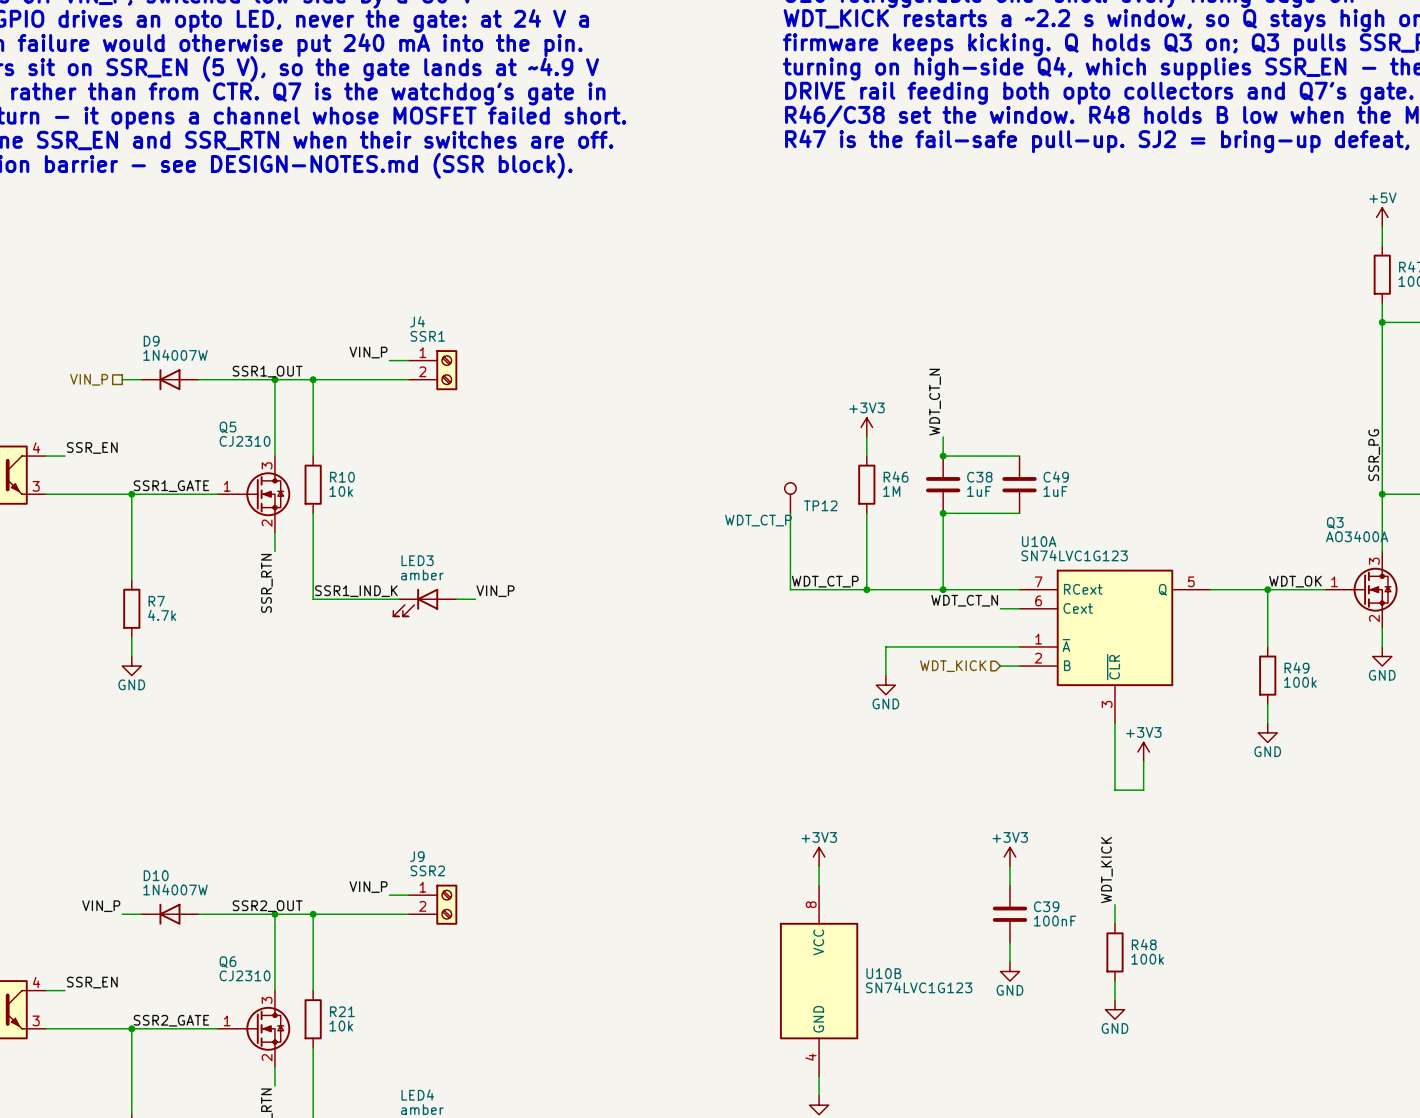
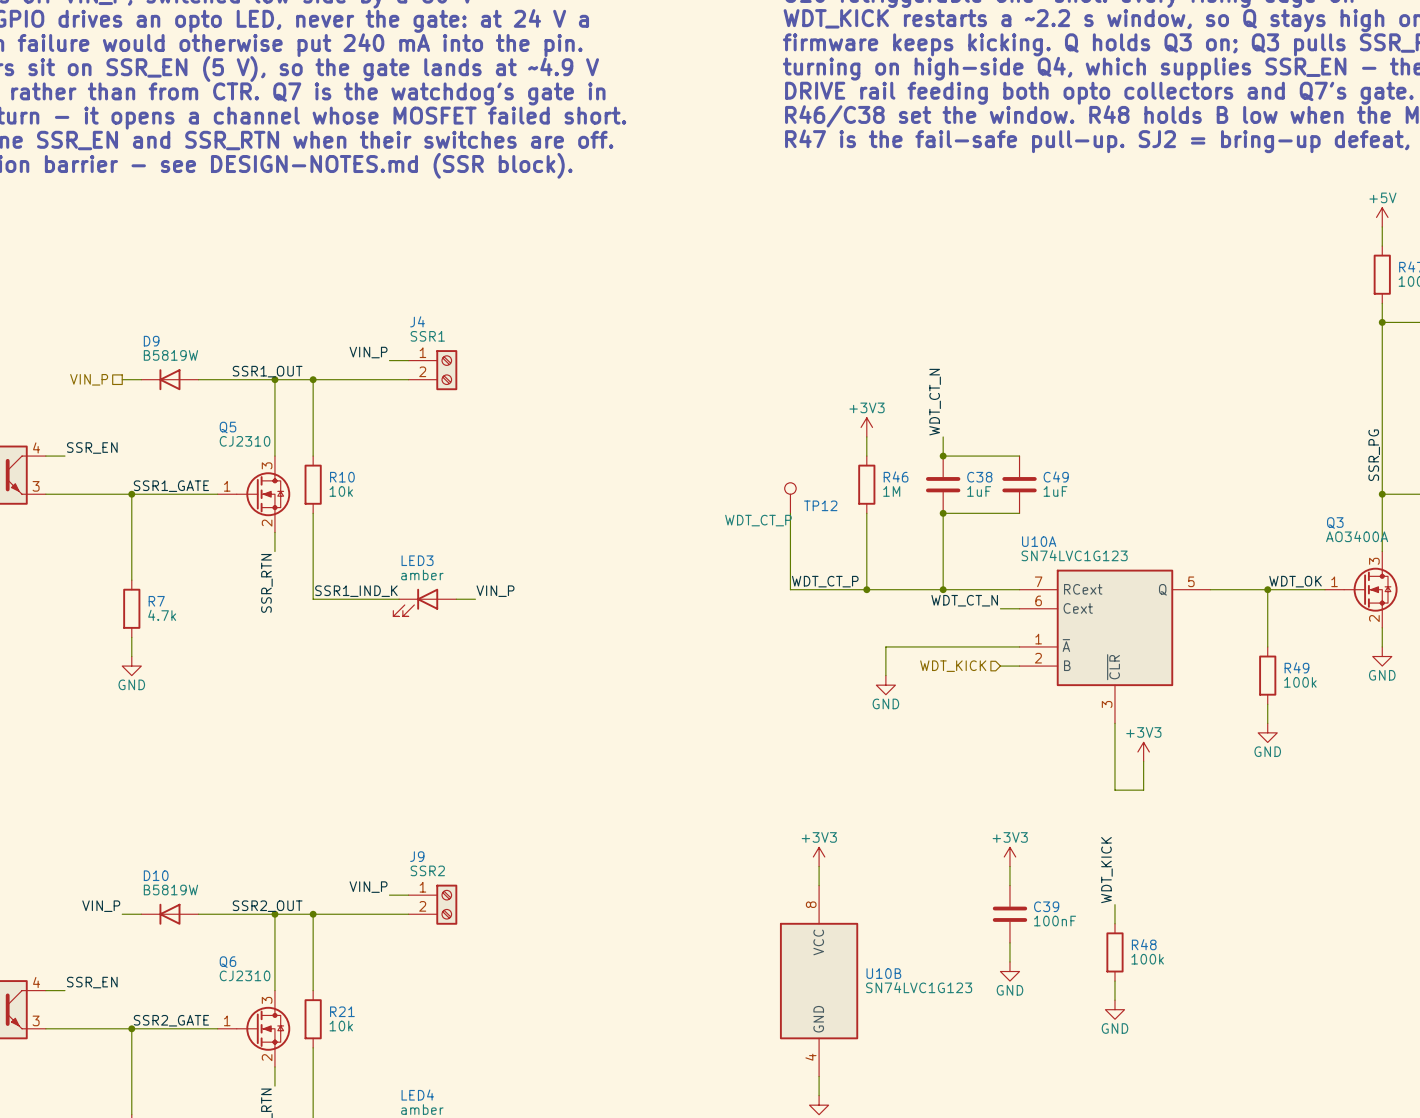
D9 value: 1N4007W (175, 355) -> B5819W (170, 355)
D10 value: 1N4007W (175, 889) -> B5819W (170, 889)

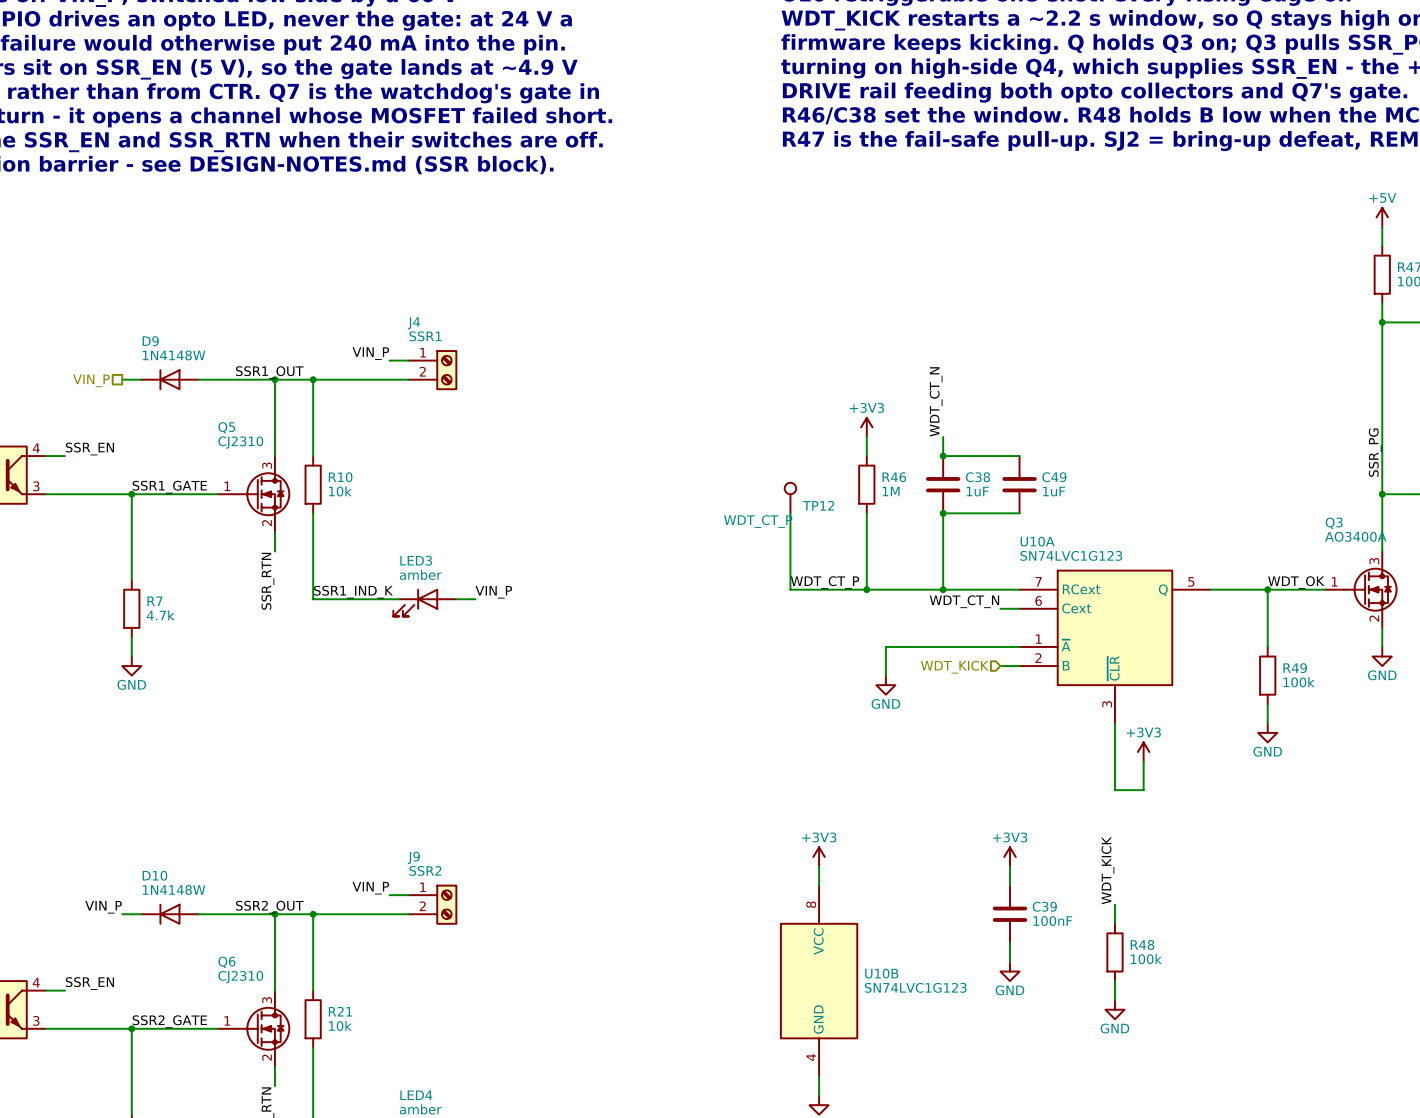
D9 value: B5819W (170, 355) -> 1N4148W (174, 355)
D10 value: B5819W (170, 889) -> 1N4148W (174, 890)

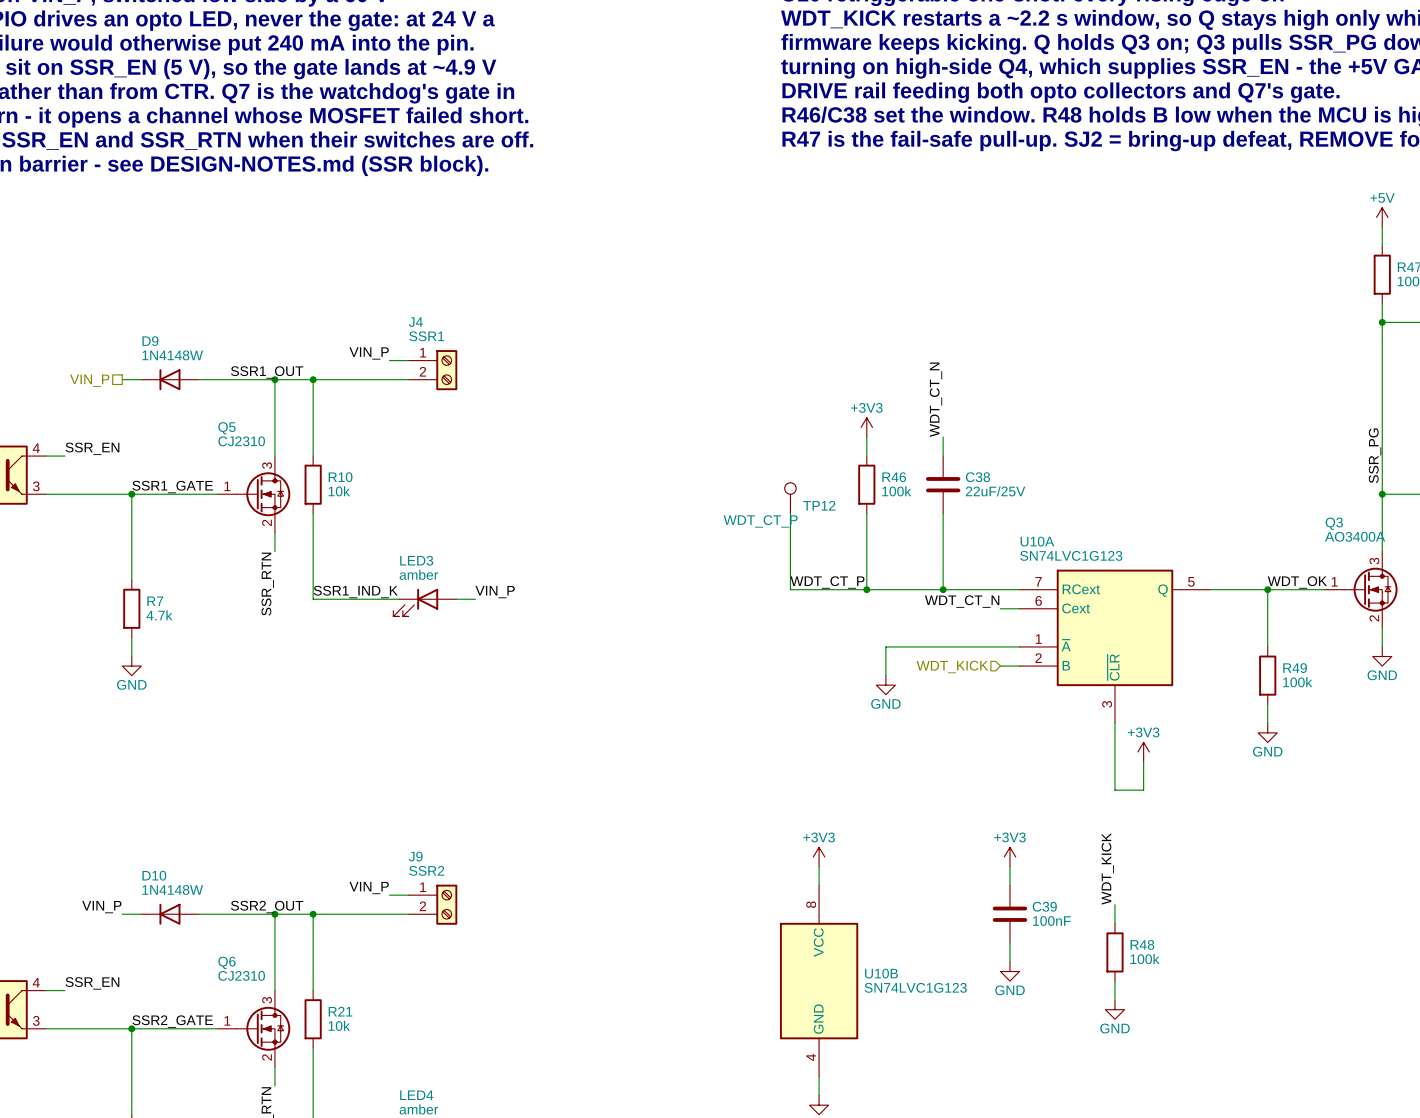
wire: (943, 456) (1019, 456) -> none
junction: (943, 456) -> none
C49: 1uF (1019, 484) -> none
R46 value: 1M (891, 491) -> 100k (896, 491)
C38 value: 1uF (977, 491) -> 22uF/25V (995, 491)
wire: (943, 513) (1019, 513) -> none
junction: (943, 513) -> none

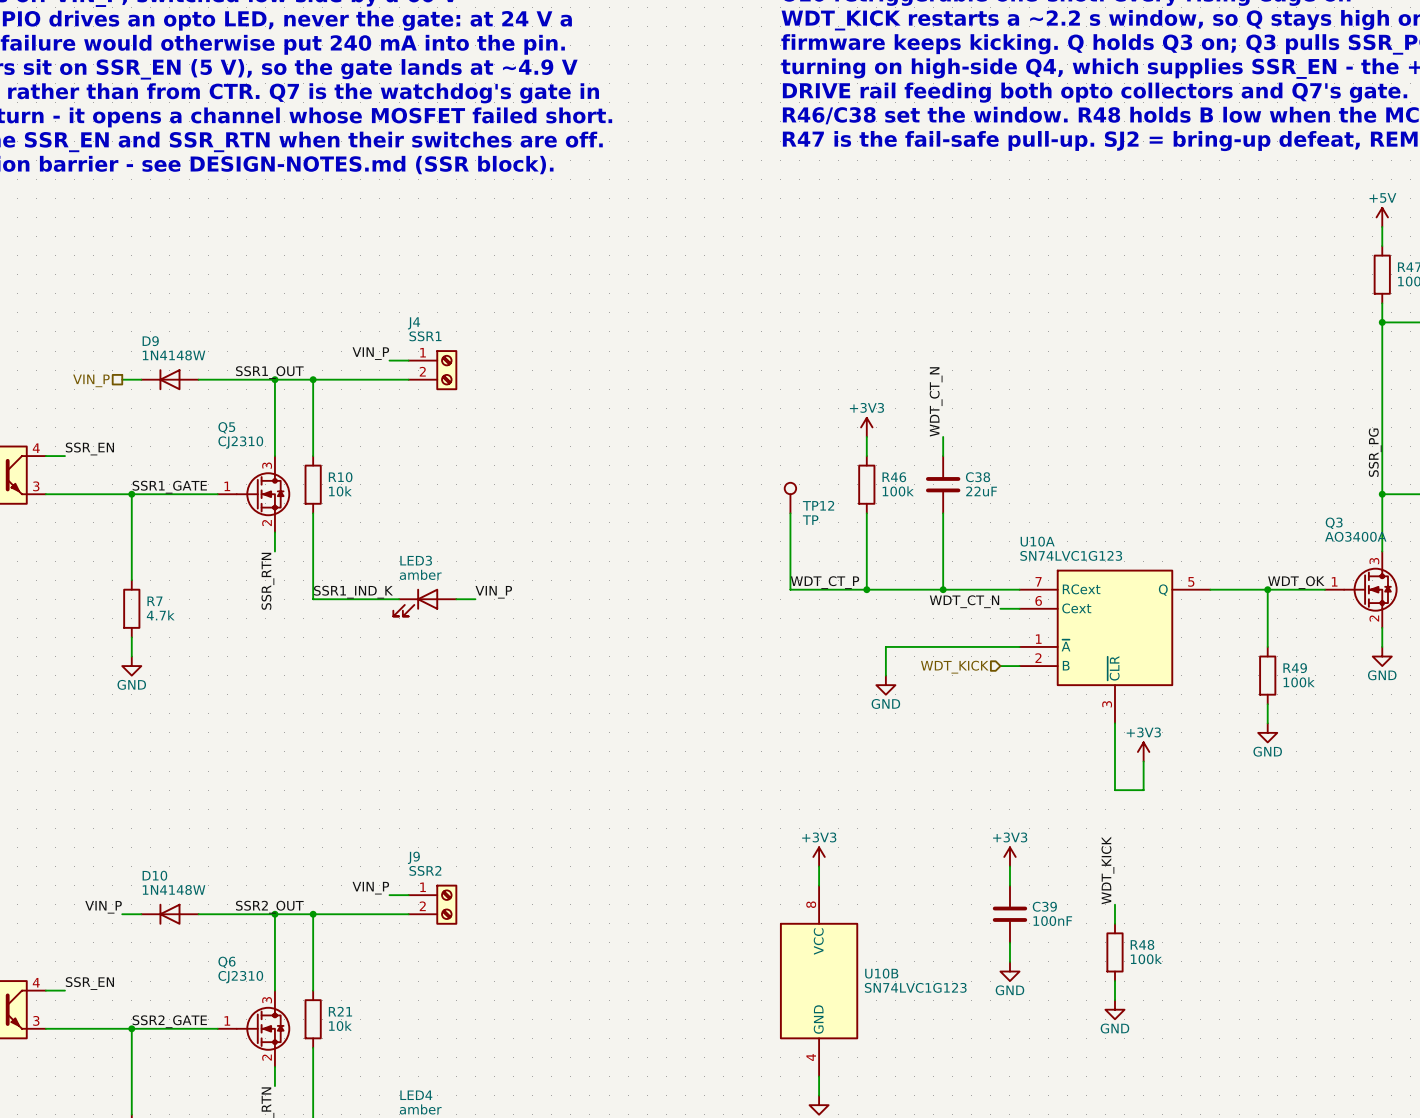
C38 value: 22uF/25V (995, 491) -> 22uF (981, 491)
TP12 value: WDT_CT_P (760, 521) -> TP (810, 520)

